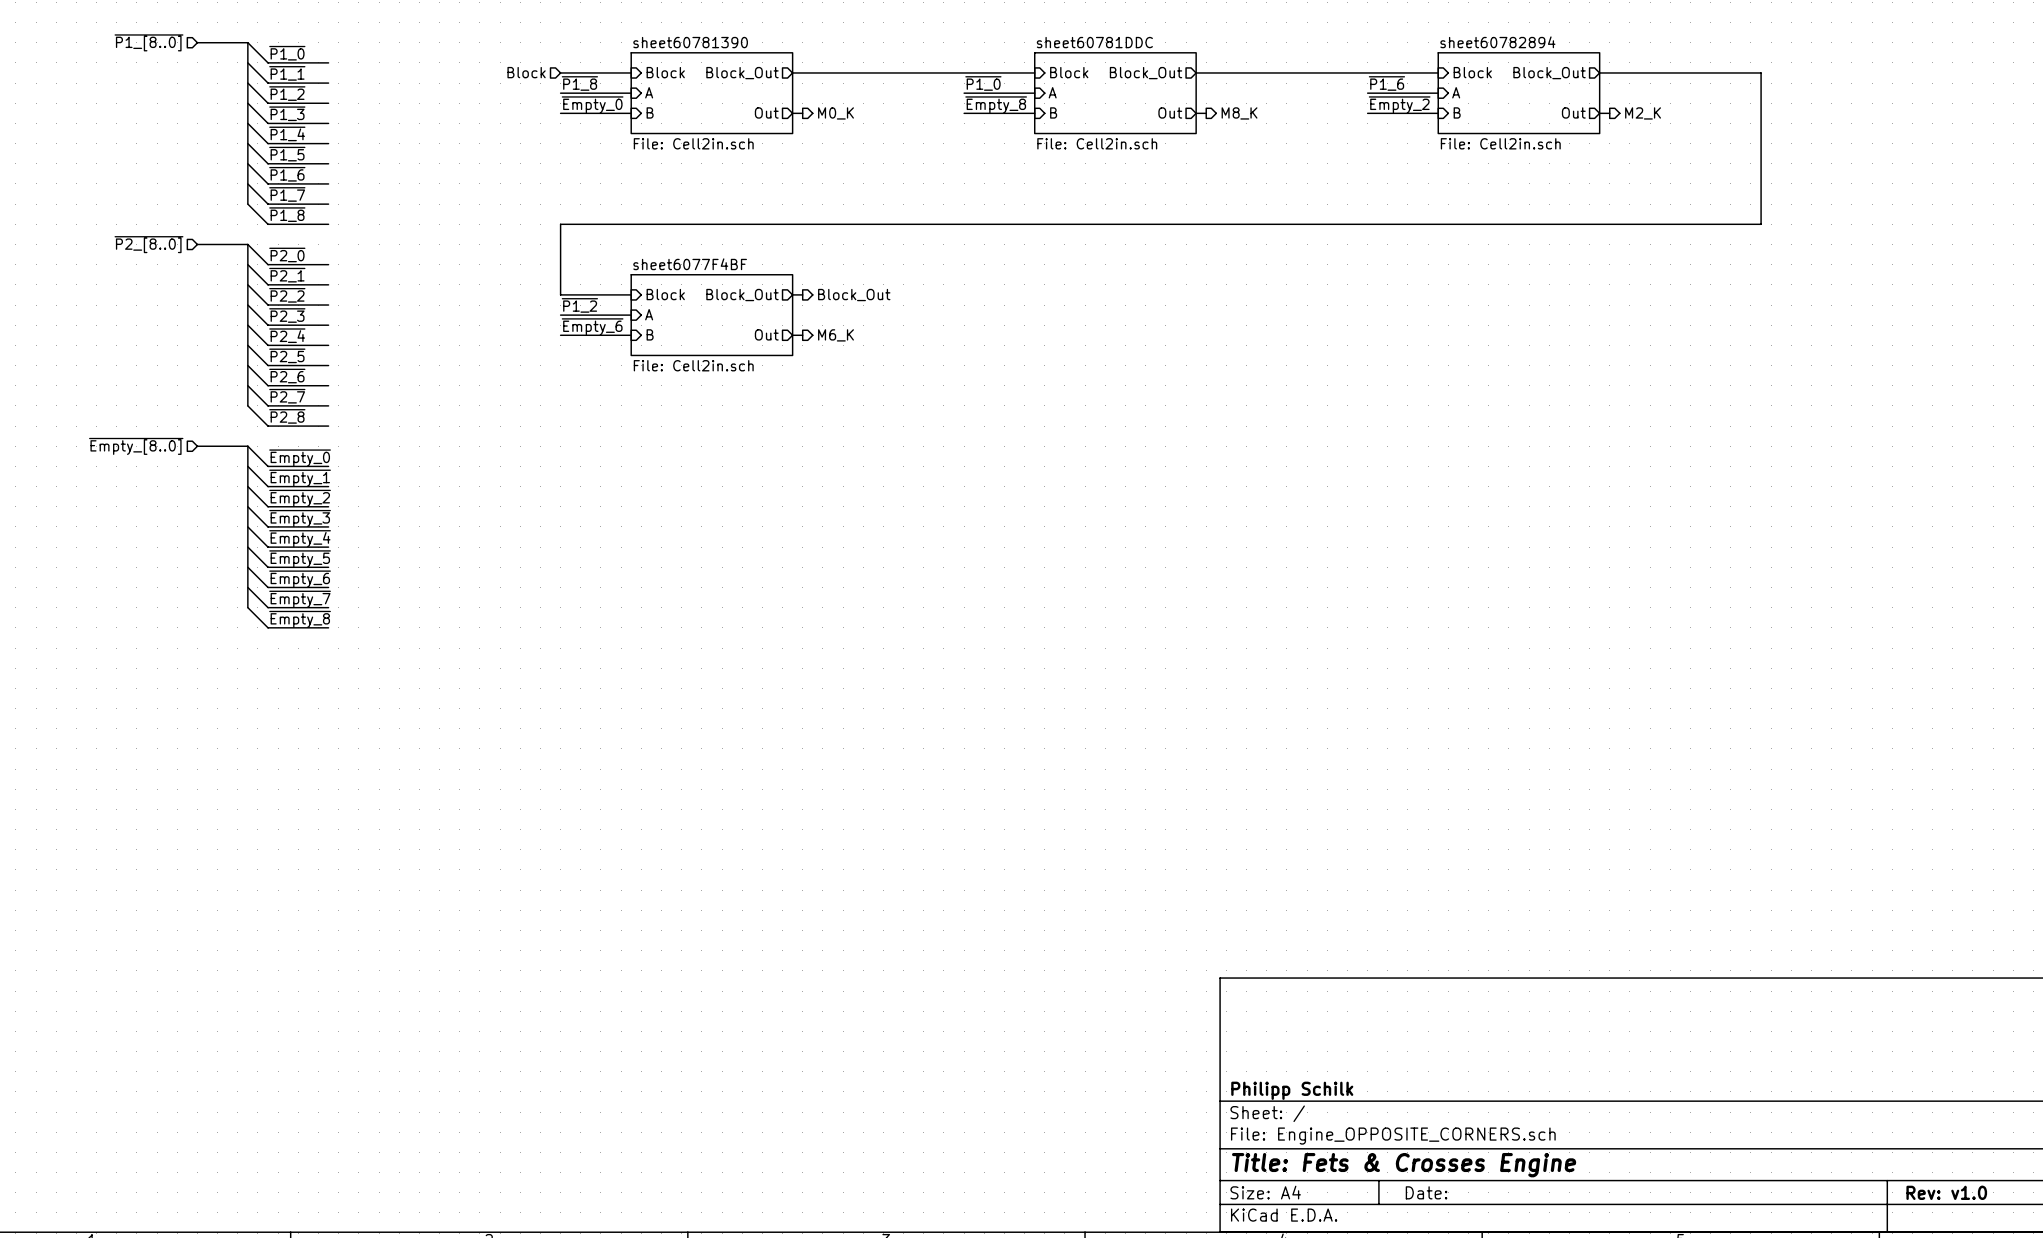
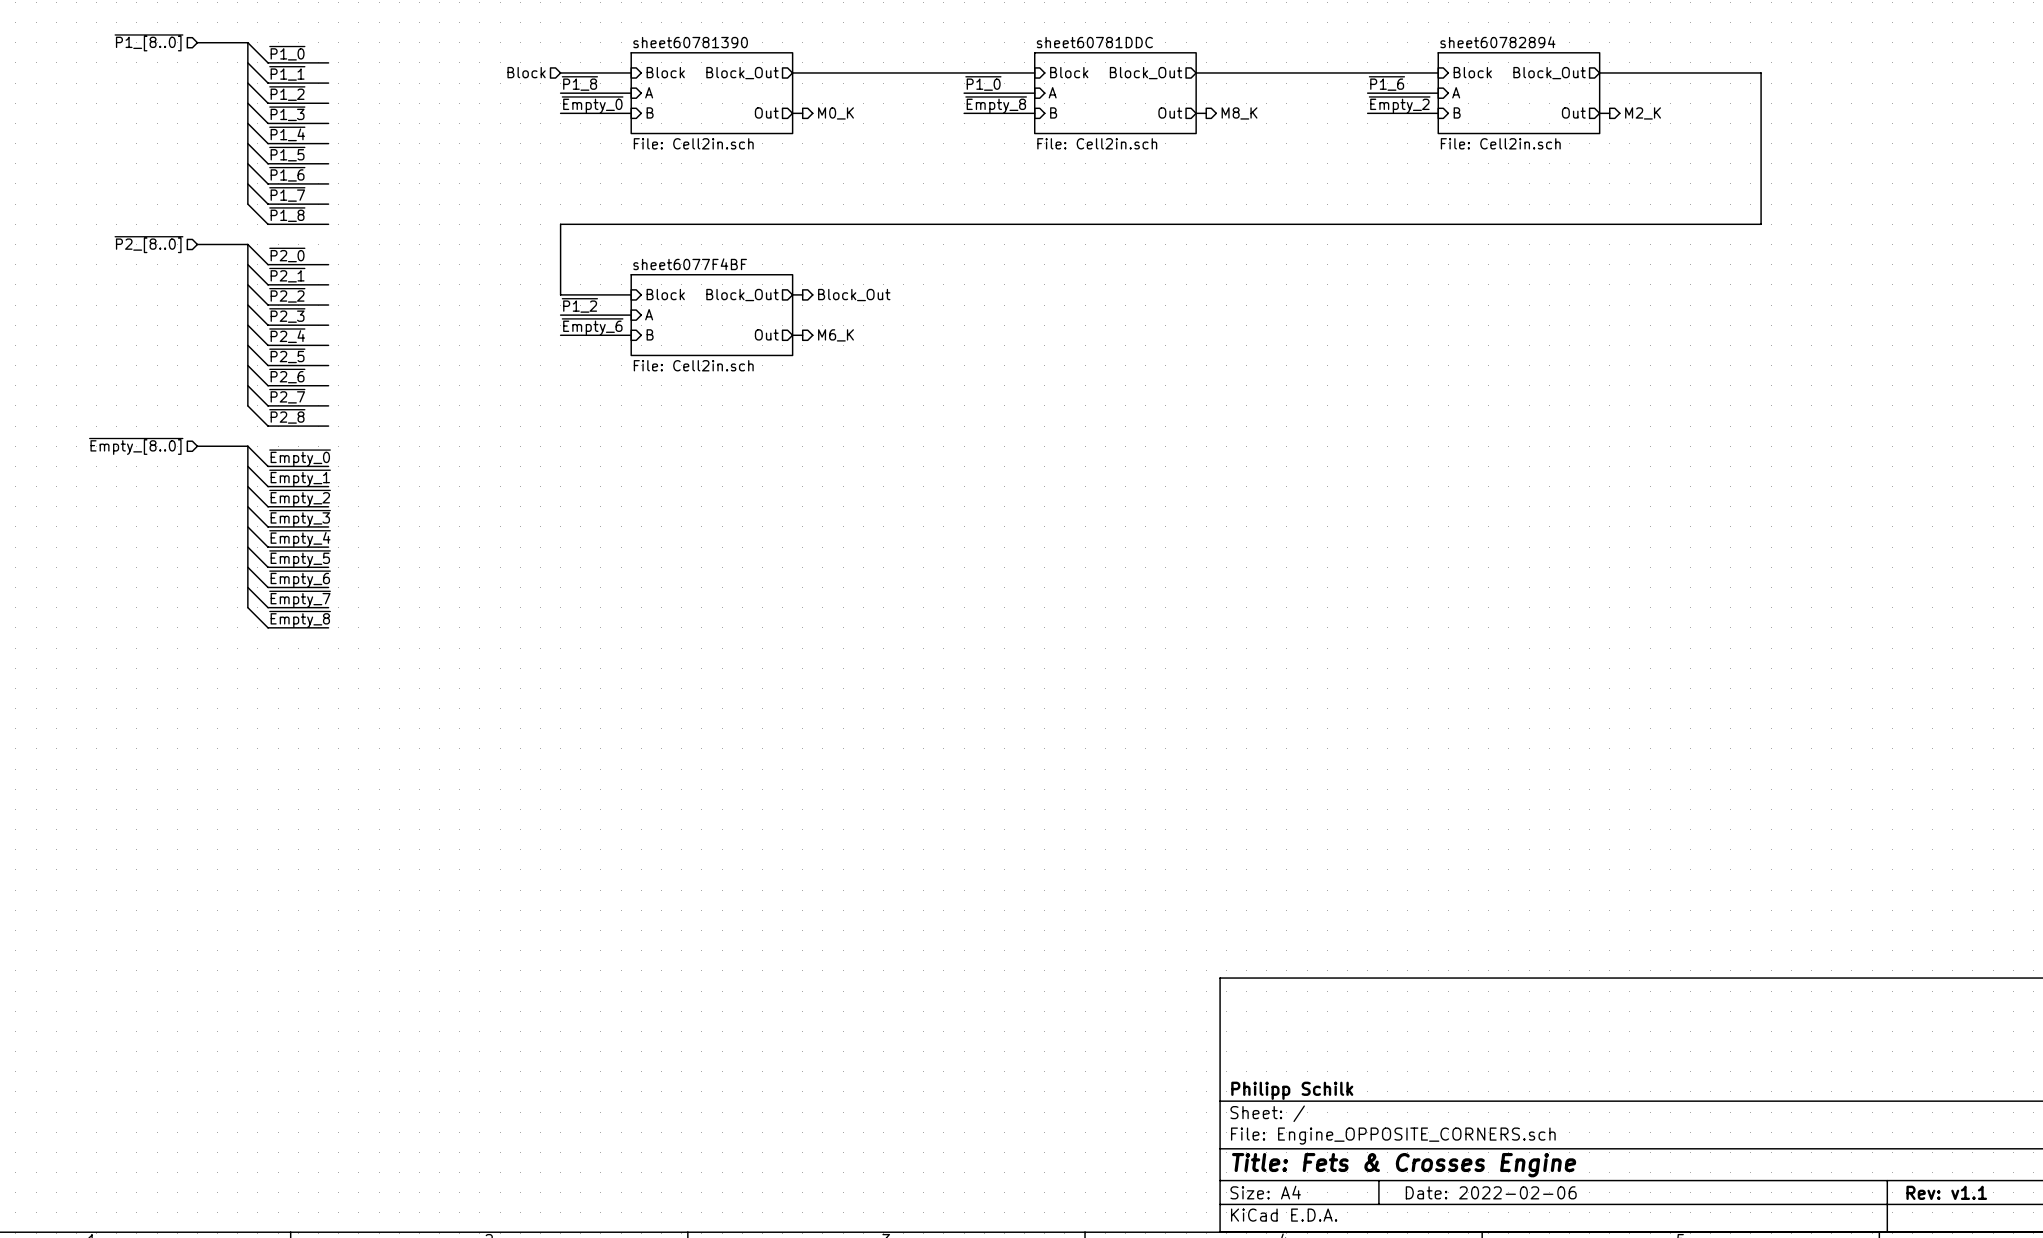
title block: Date: (1426, 1192) -> Date: 2022-02-06 (1491, 1192)
title block: Rev: v1.0 (1946, 1192) -> Rev: v1.1 (1946, 1192)

